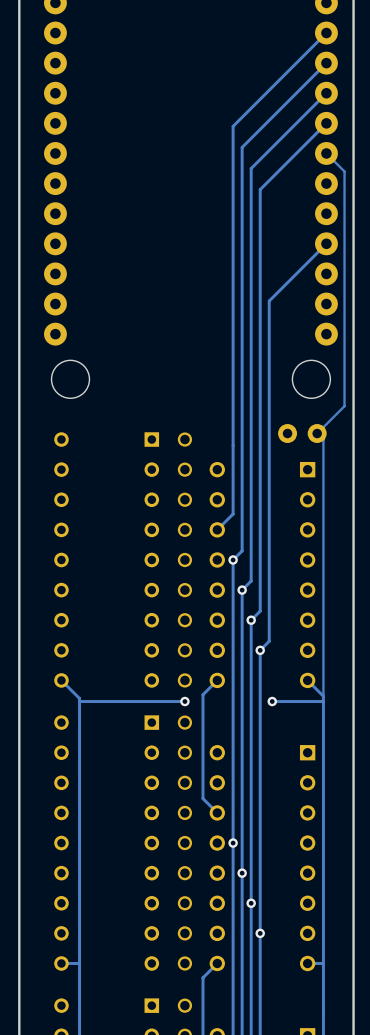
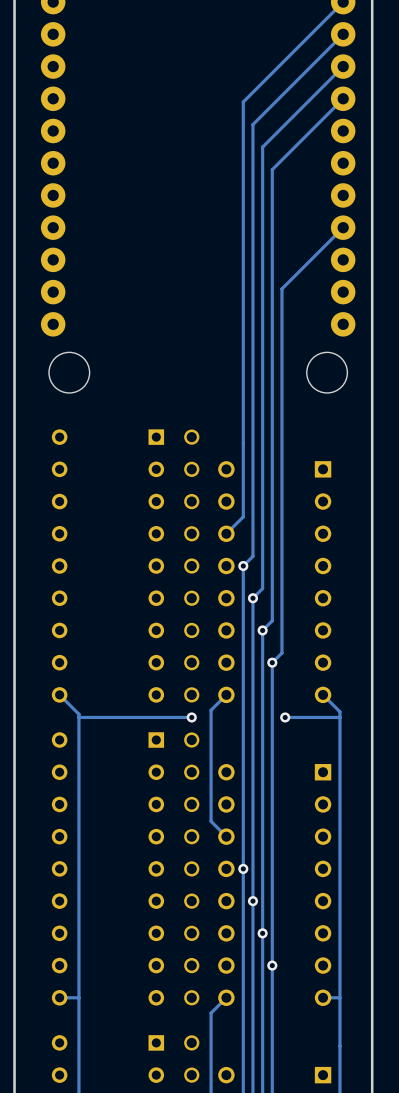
track: (326, 153) (344, 171) (344, 406) (317, 433) (323, 439) (323, 696) -> none
part: (302, 433) -> none

